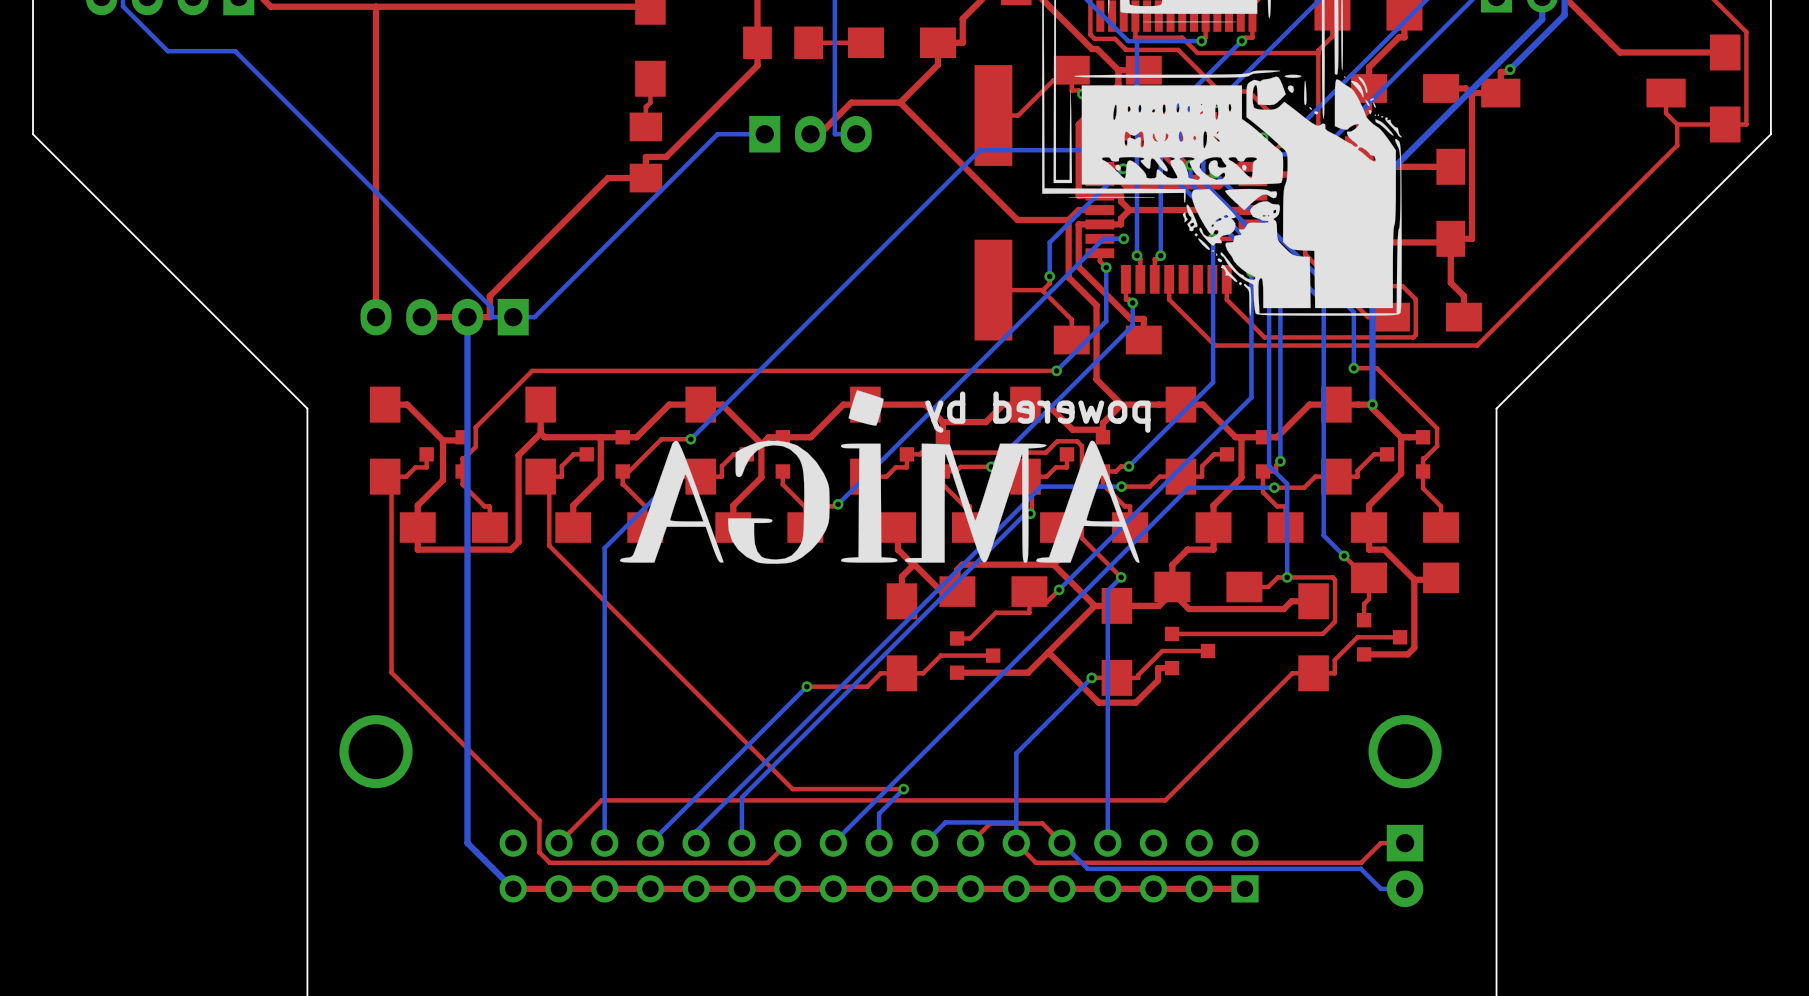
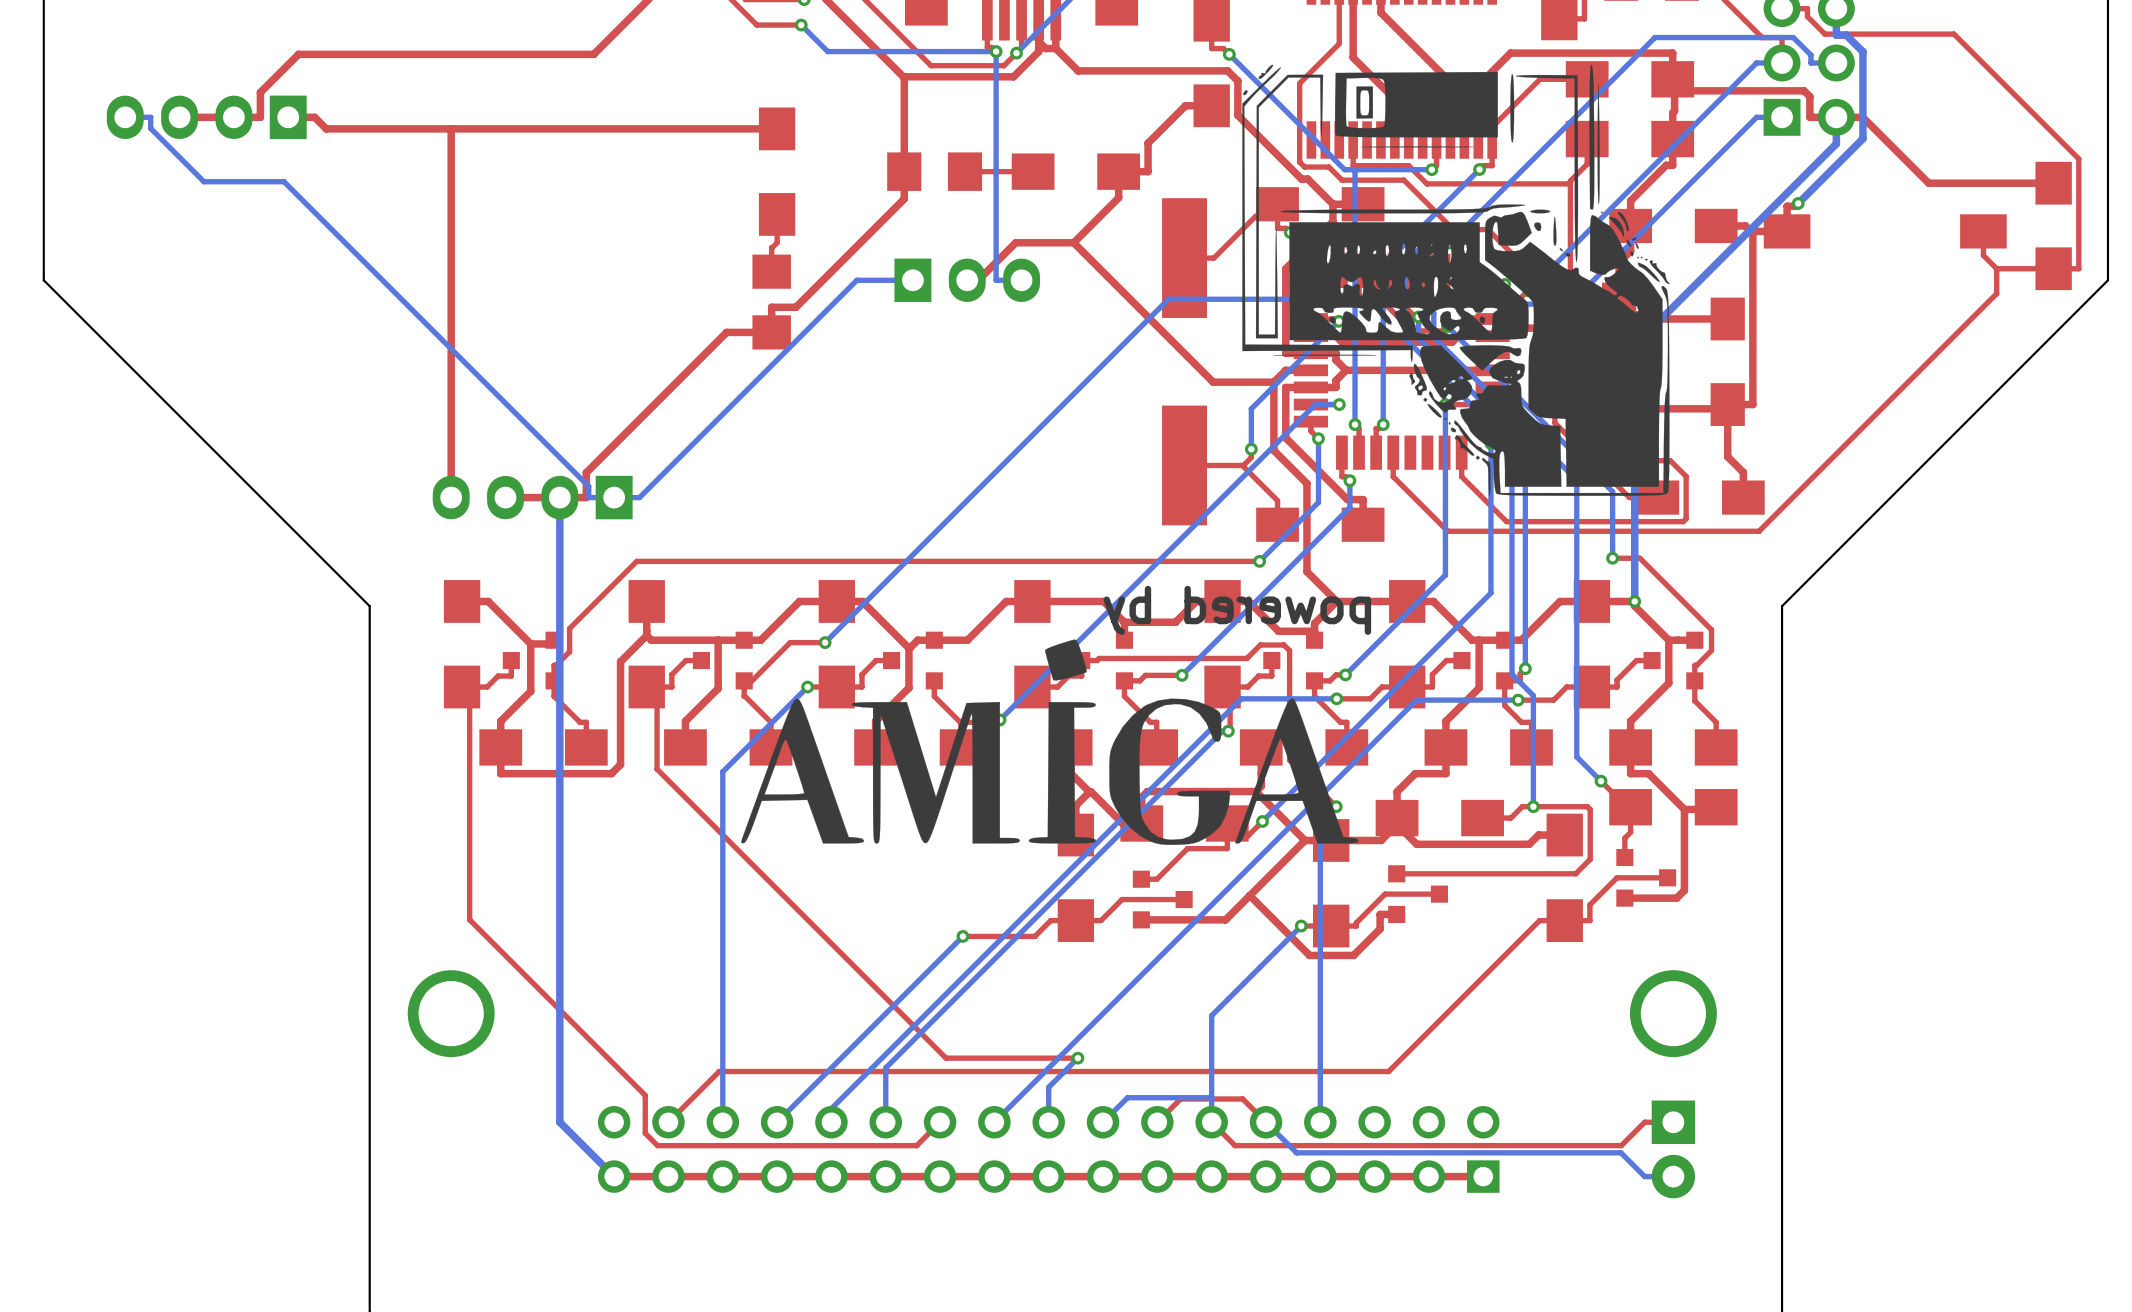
drawing: [619, 390, 1140, 564] -> none
drawing: none -> [741, 639, 1359, 845]

